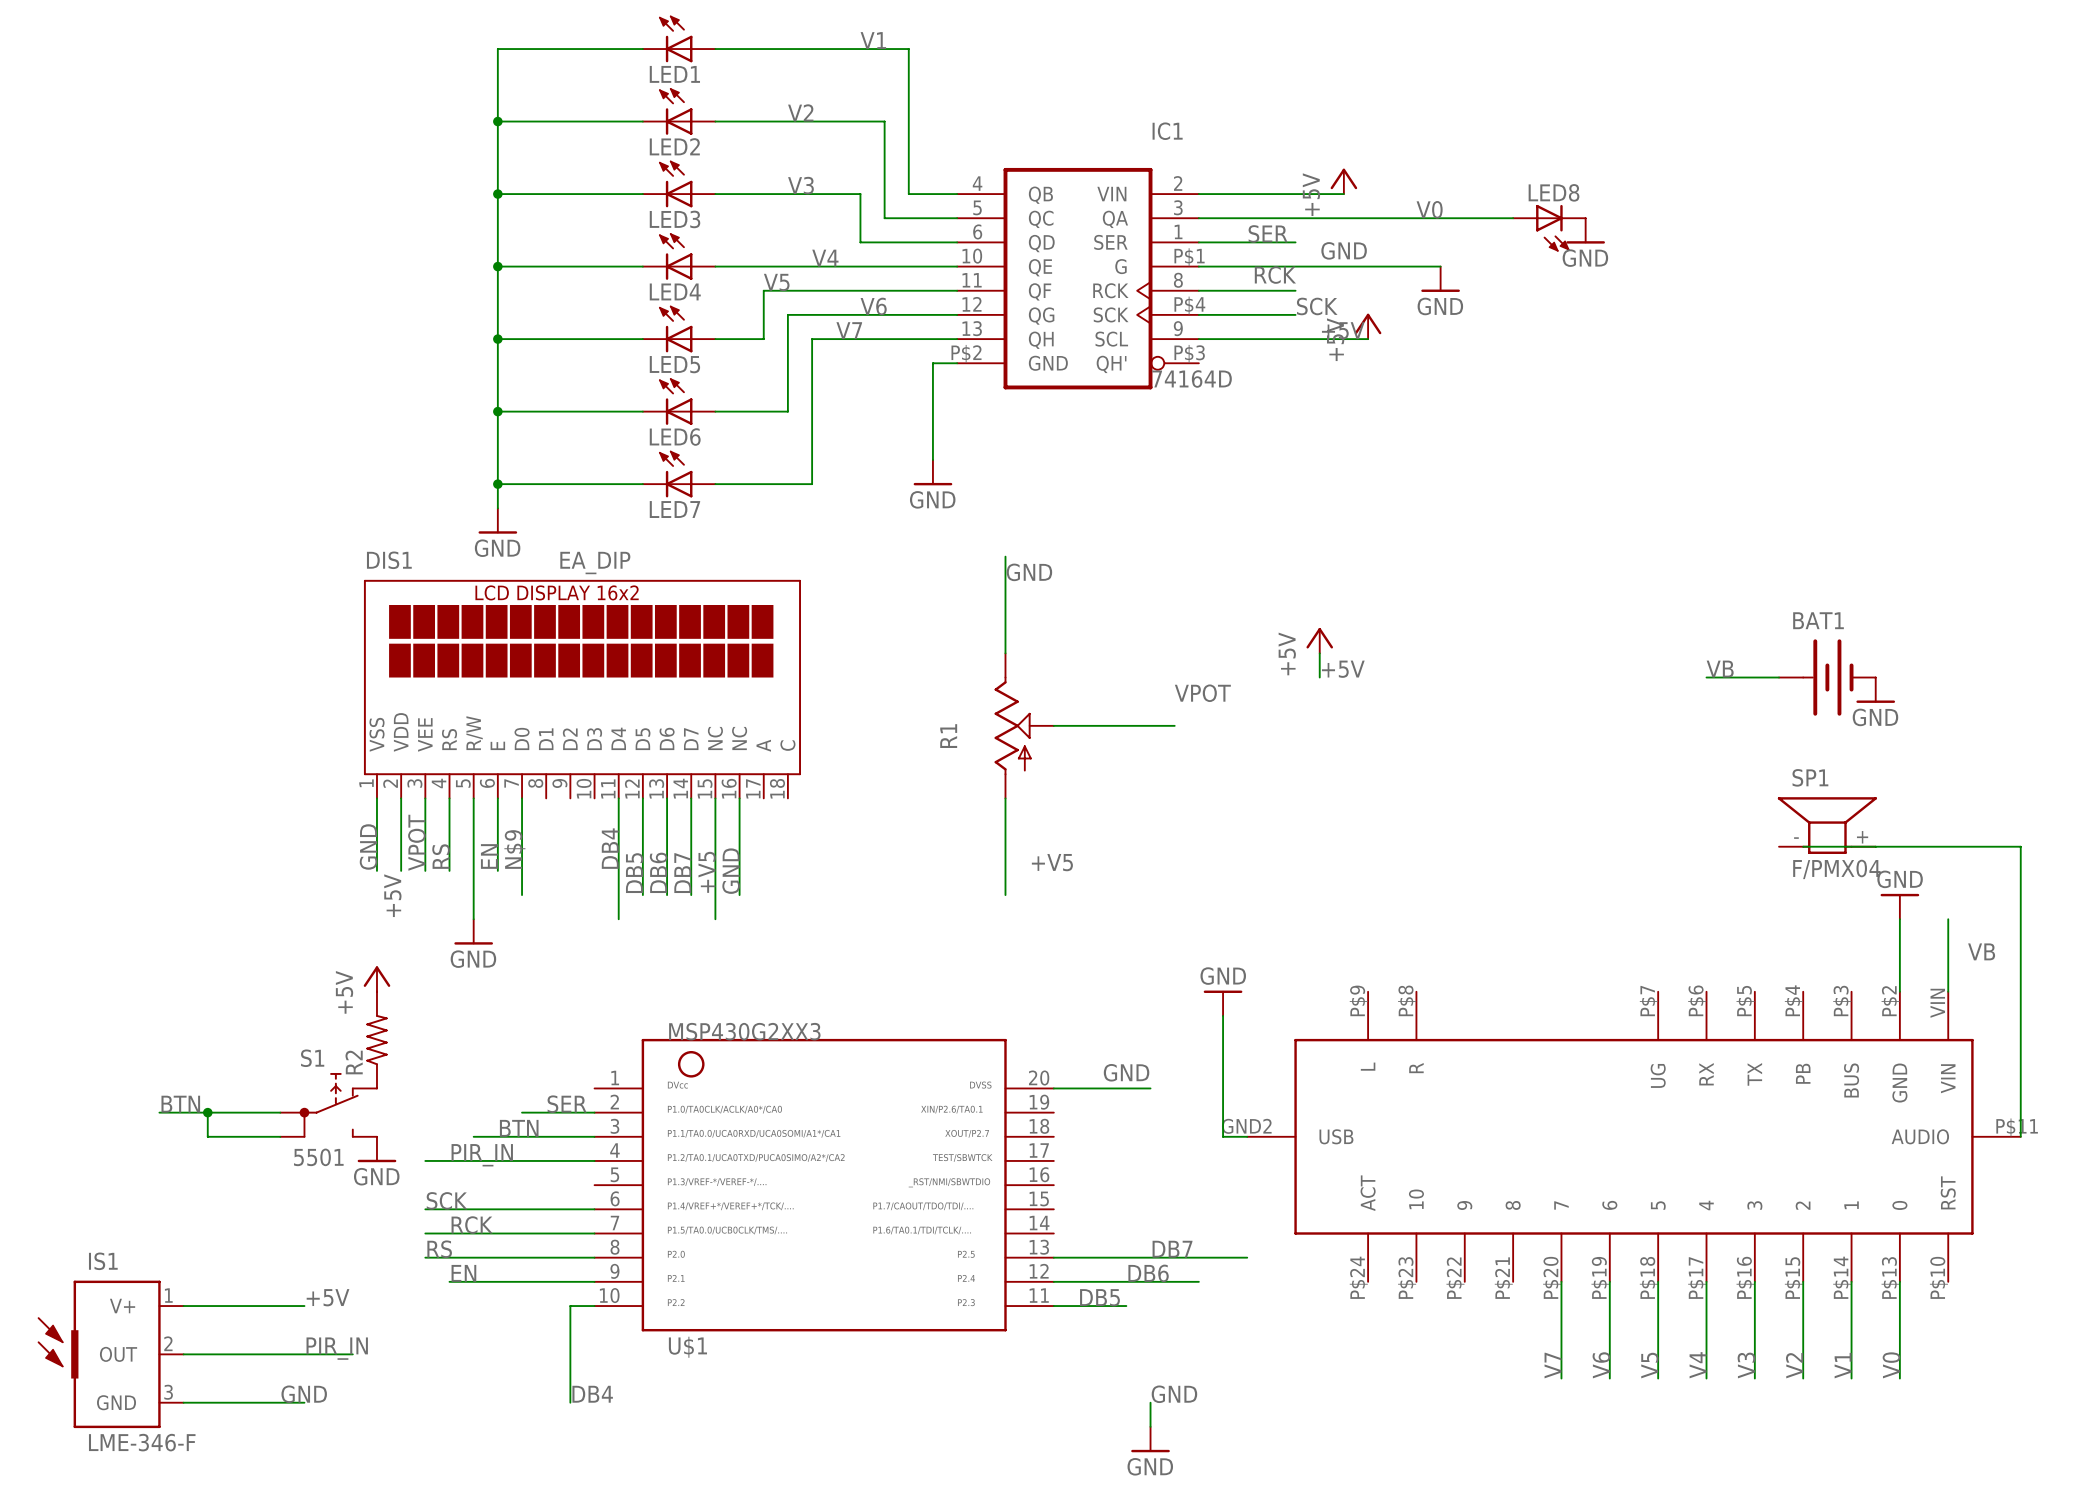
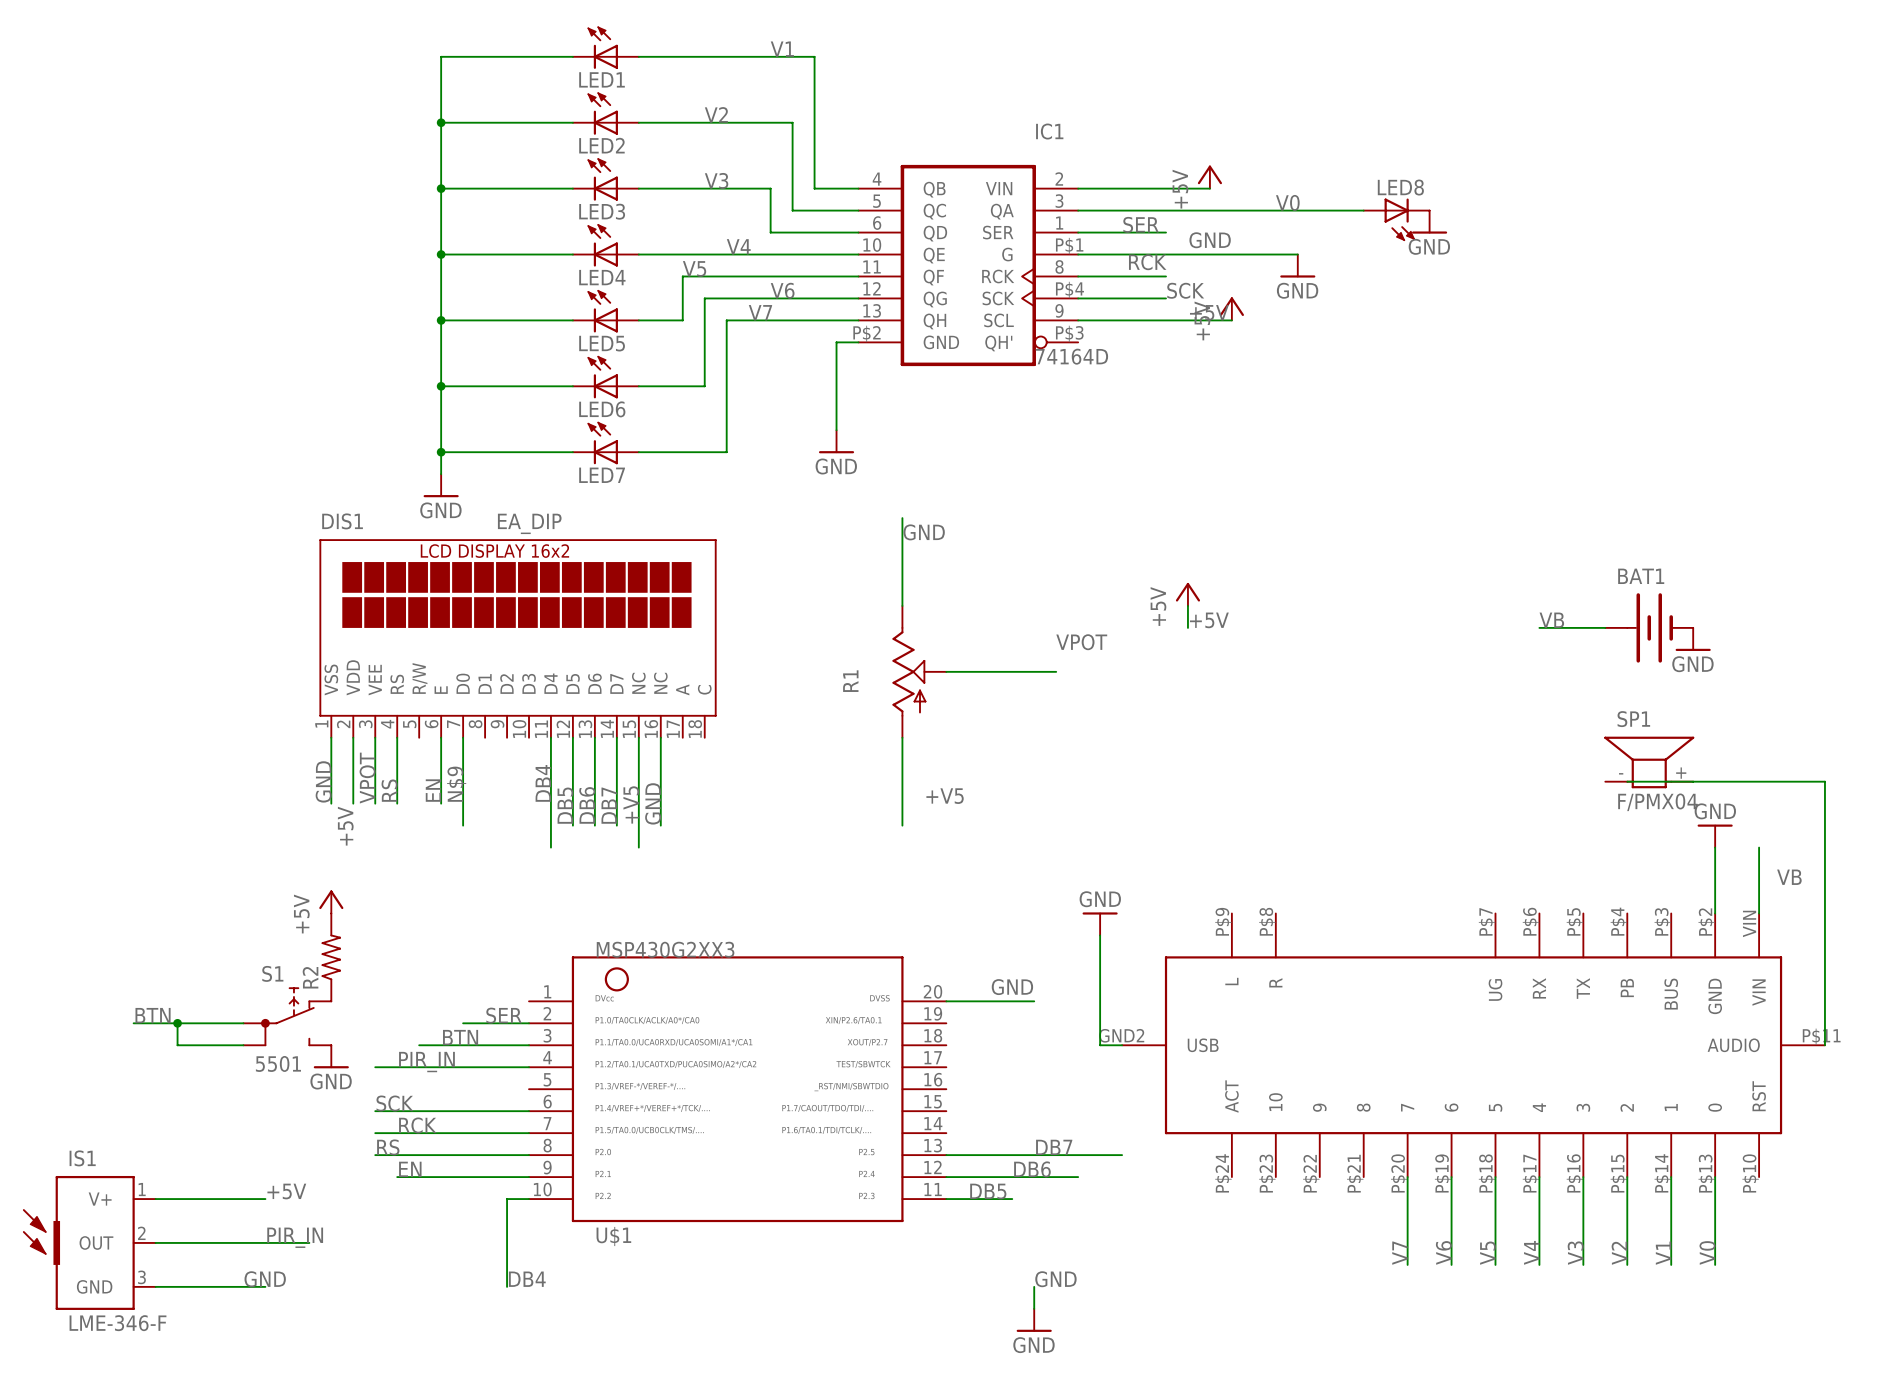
wire: (473, 798) (473, 919) -> none
power symbol: GND (473, 931) -> none

